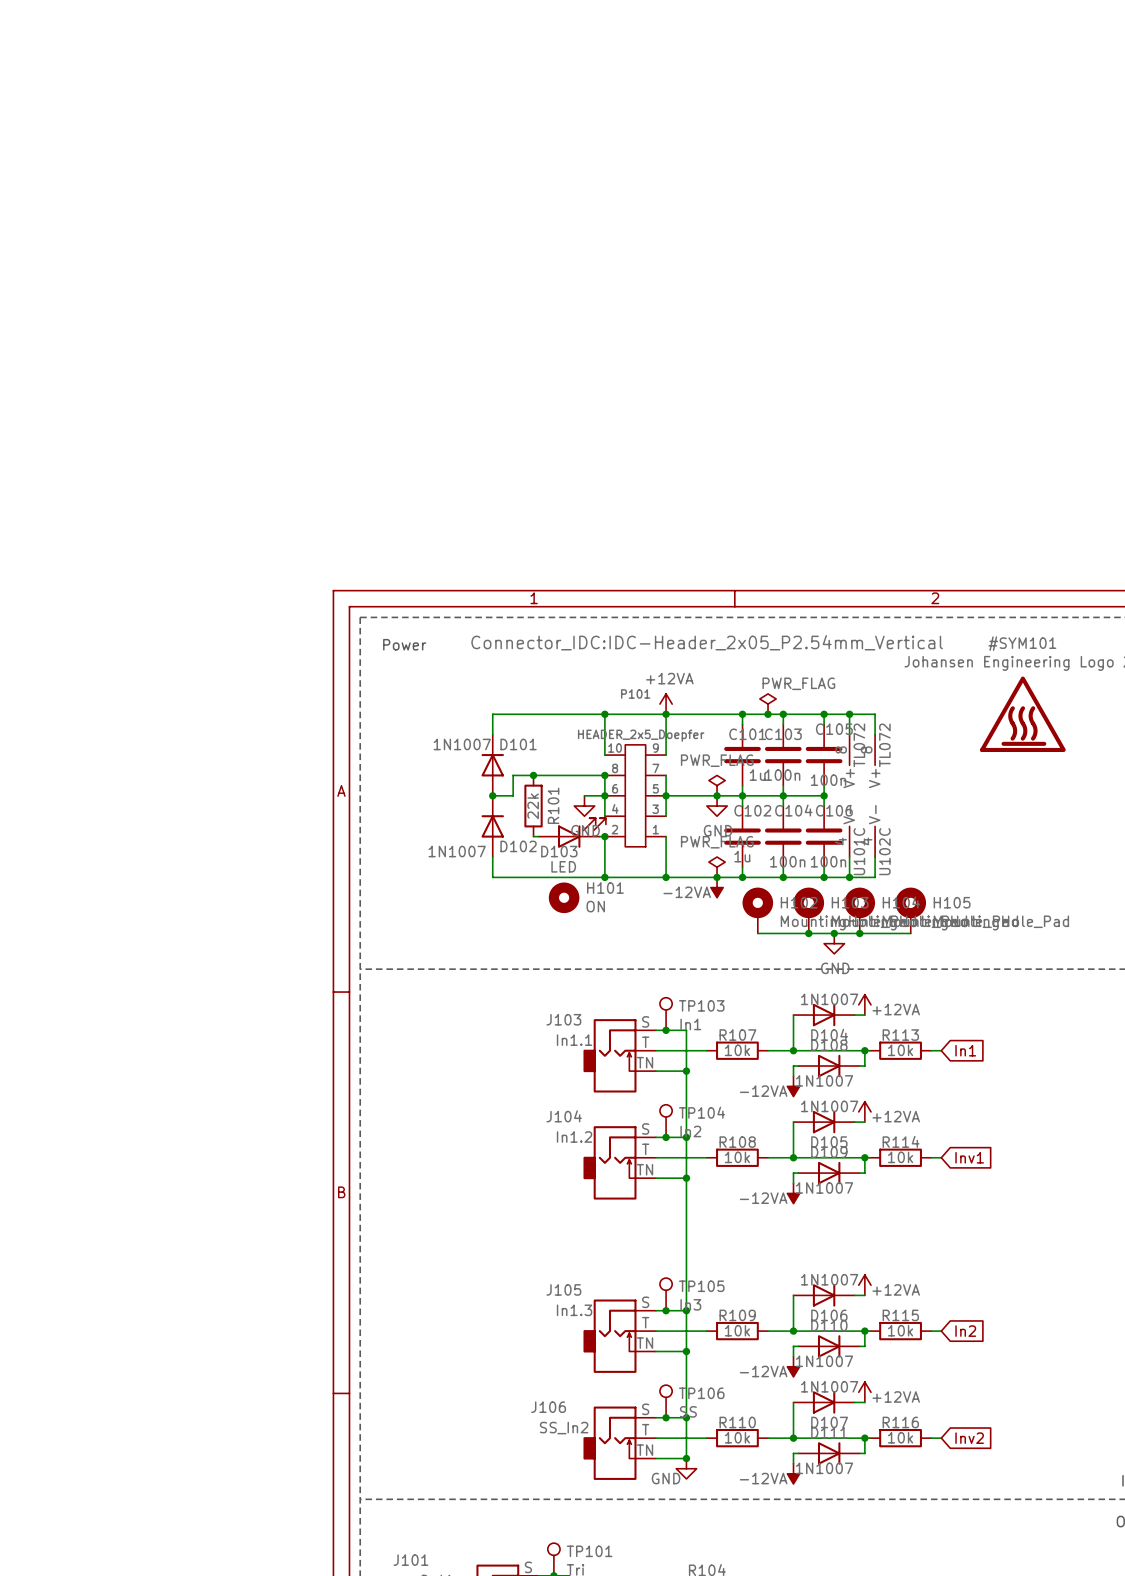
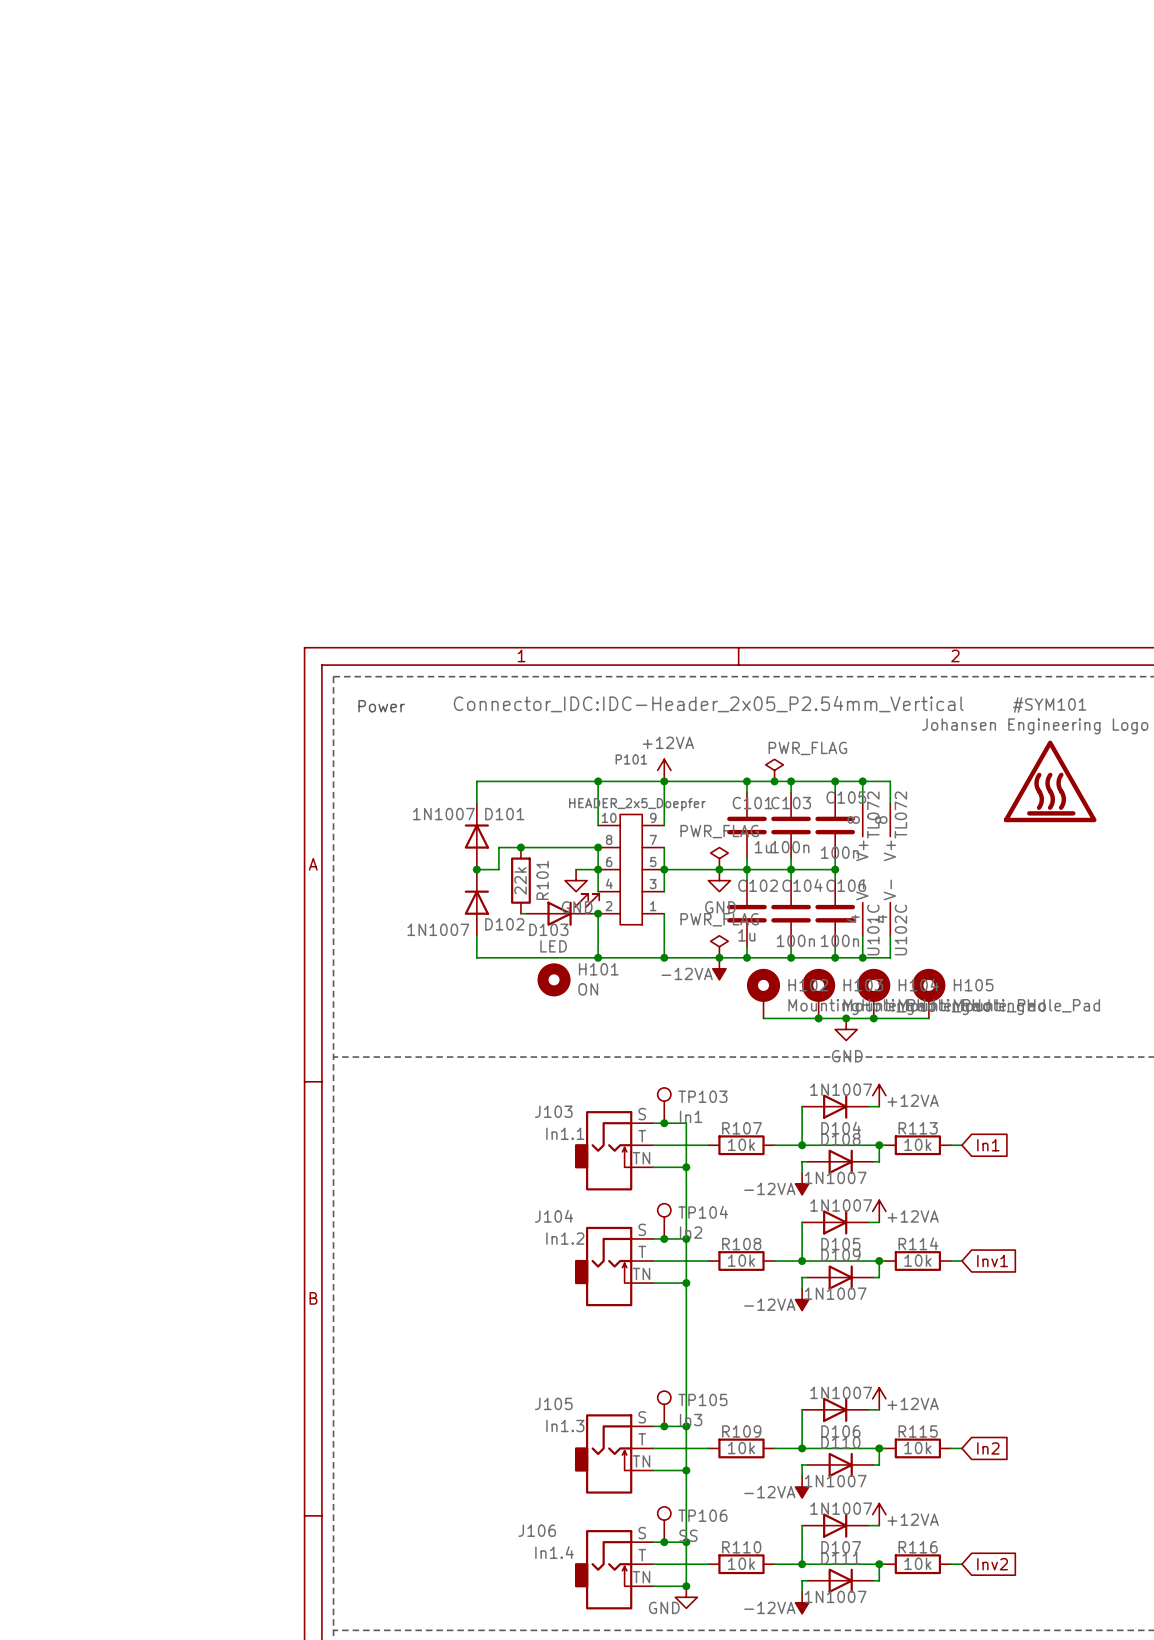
J106 value: SS_In2 (564, 1428) -> In1.4 (554, 1552)

